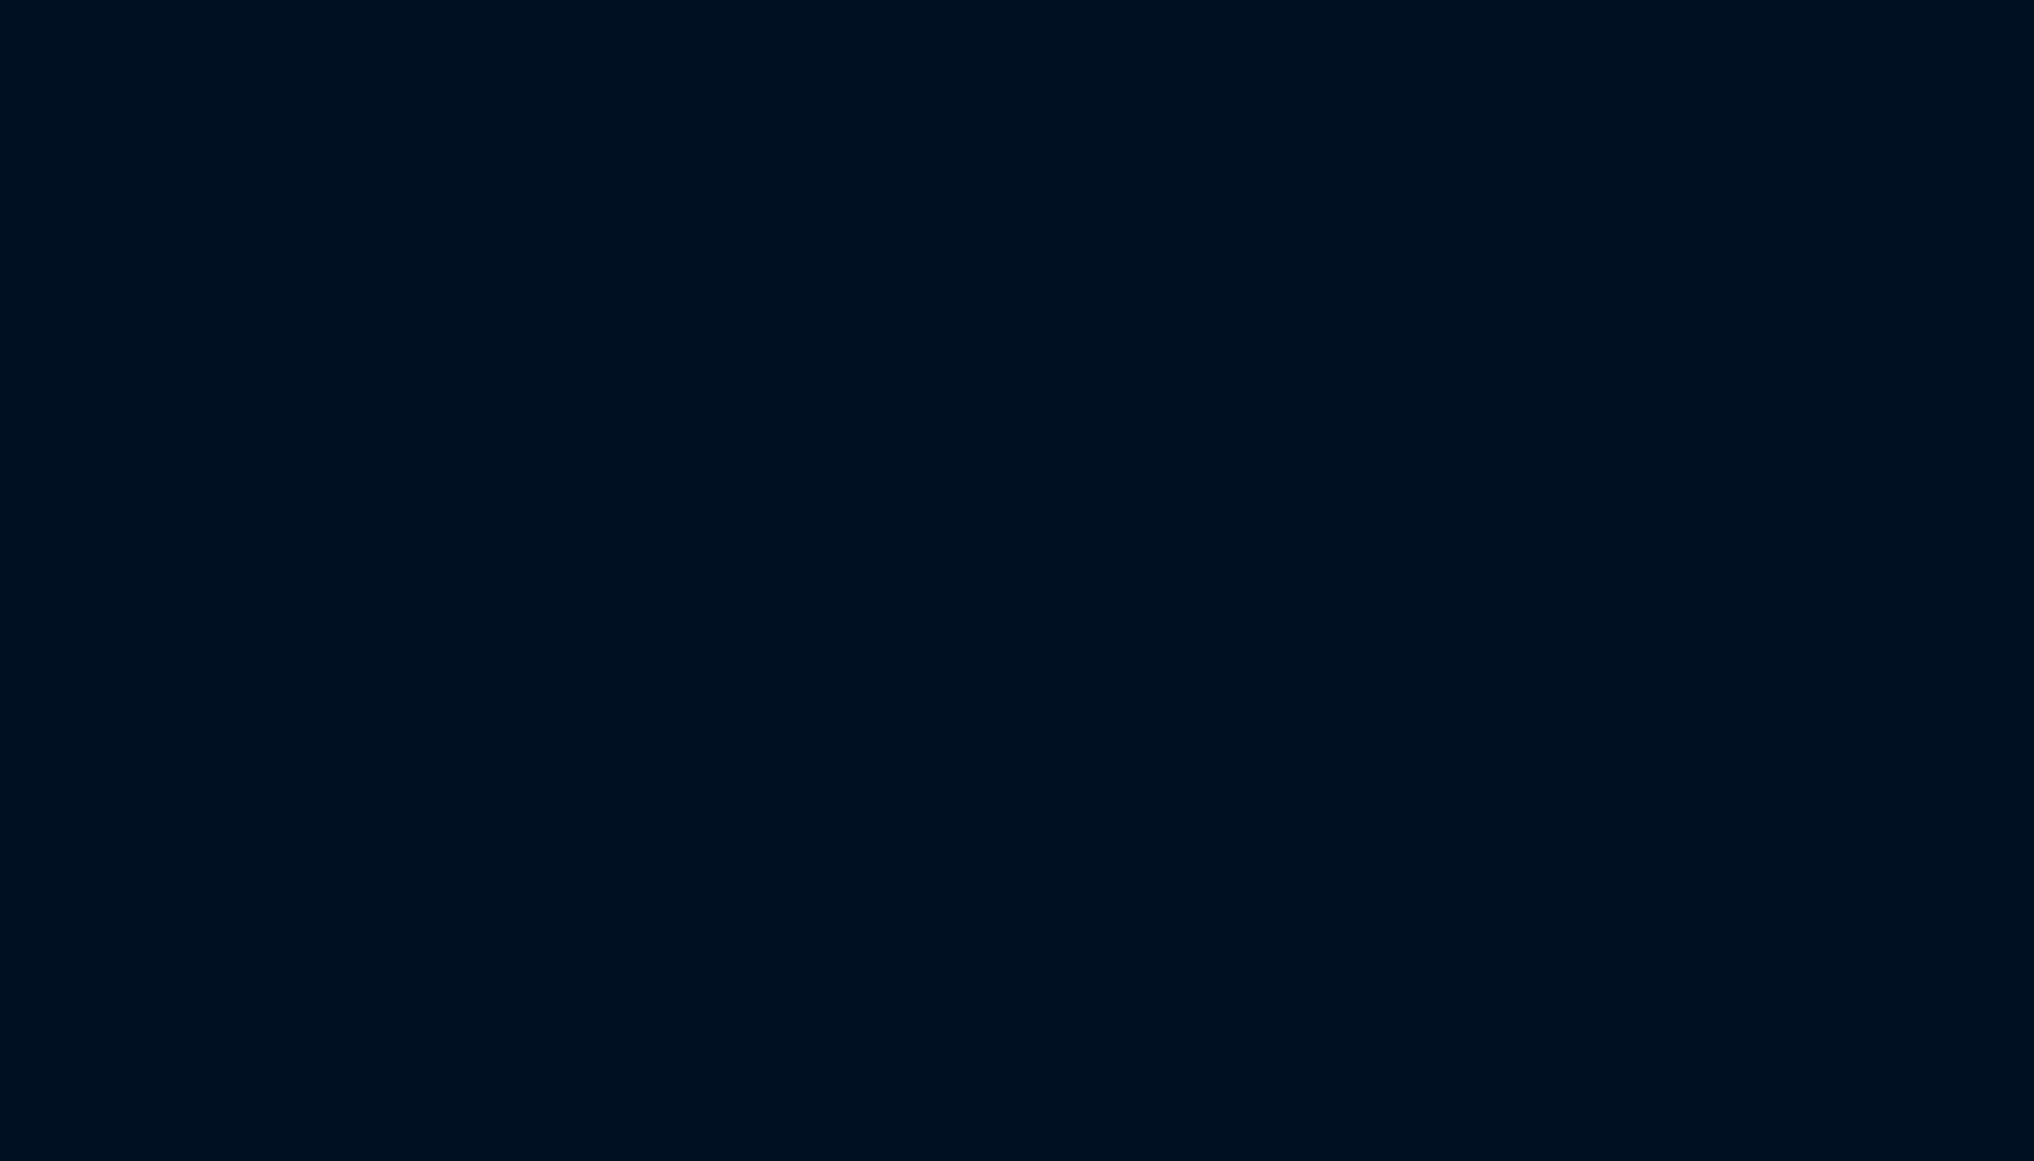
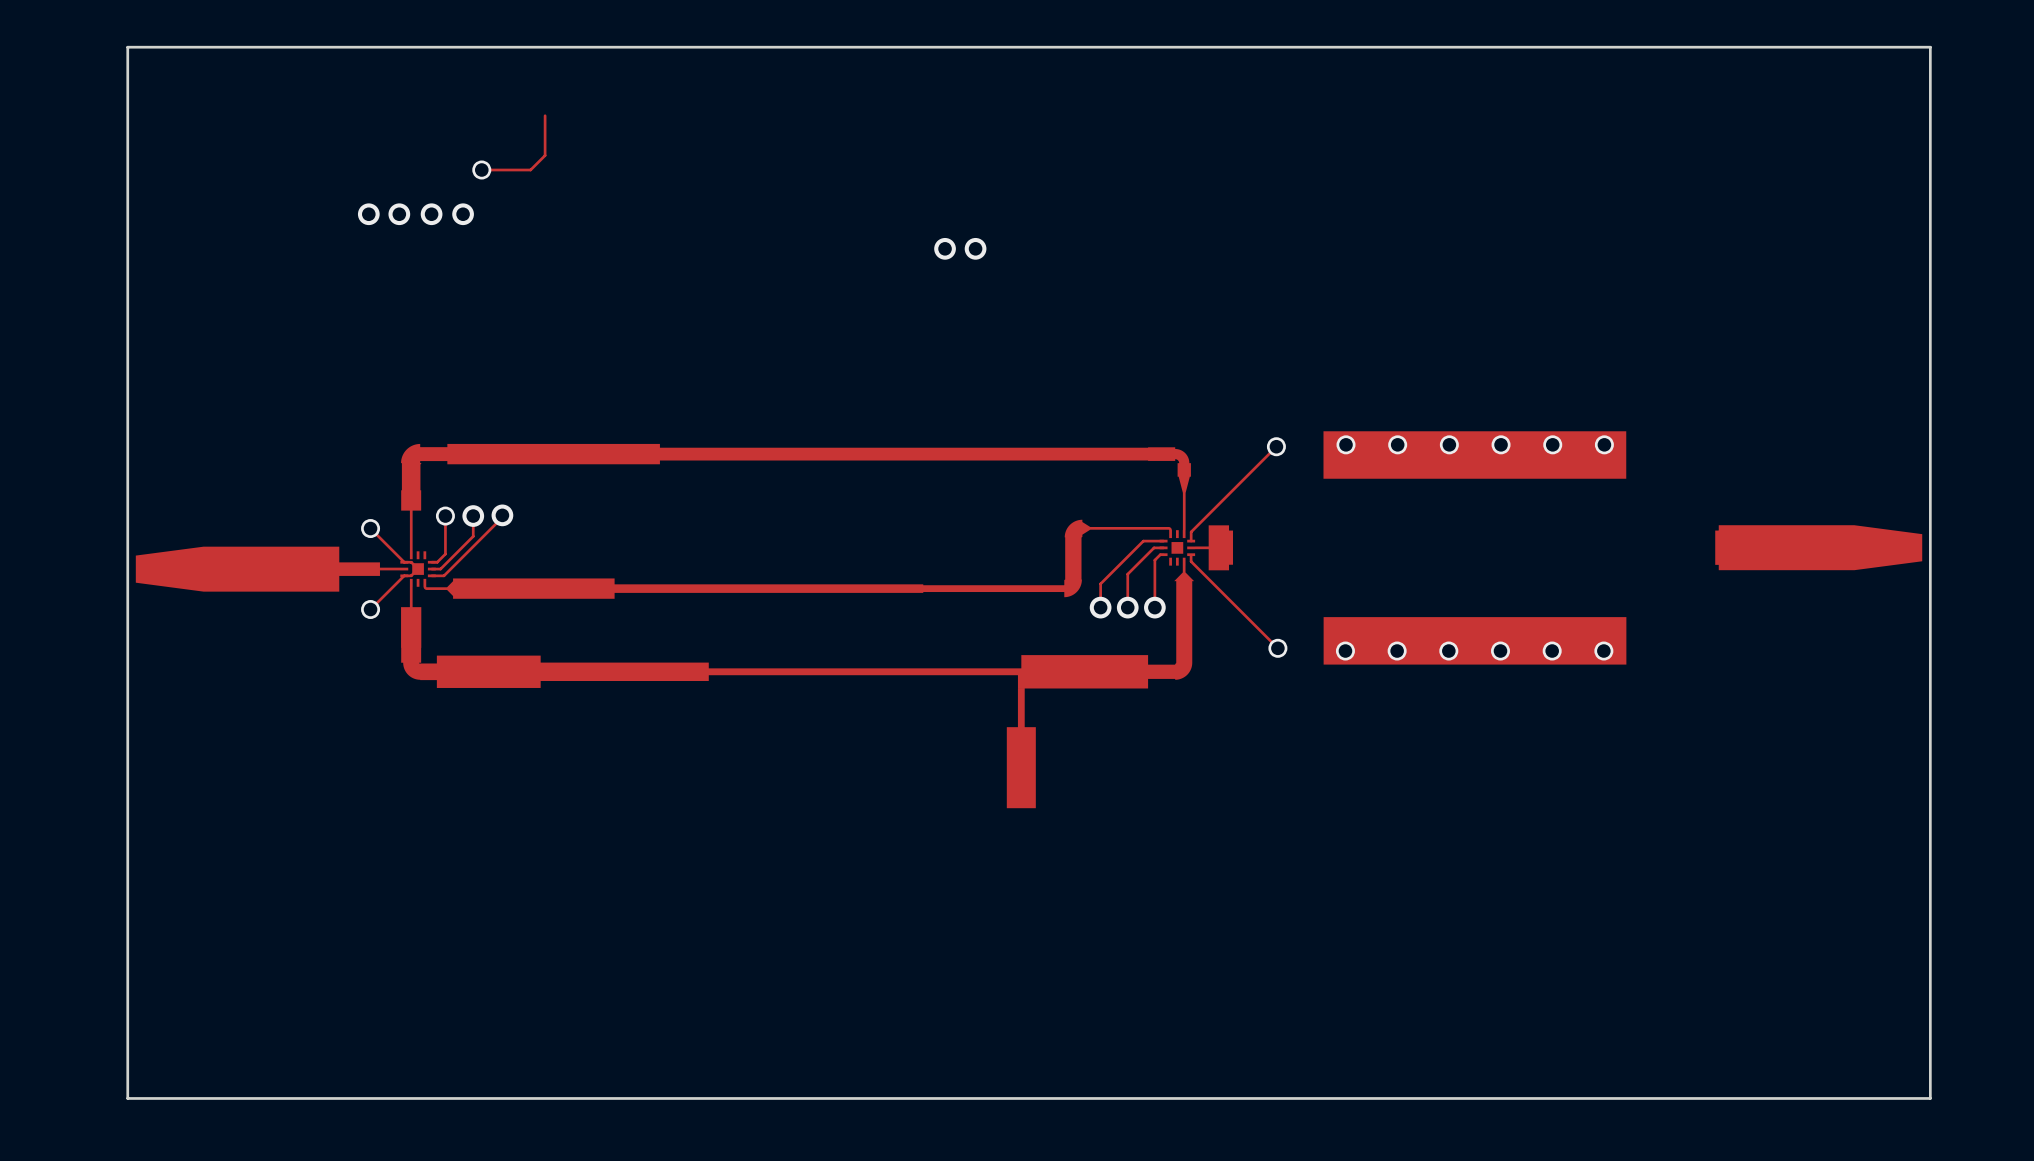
board edge: none -> (127, 47) (1930, 47) (1930, 1098) (127, 1098) (127, 47)
track: none -> (545, 115) (545, 155) (530, 170) (481, 170)
via: none -> (481, 170)
via: none -> (368, 214)
via: none -> (399, 214)
via: none -> (431, 214)
via: none -> (463, 214)
via: none -> (945, 248)
via: none -> (975, 248)
drawing: none -> [1323, 431, 1627, 479]
drawing: none -> [135, 443, 1233, 809]
via: none -> (1346, 444)
via: none -> (1397, 444)
via: none -> (1449, 444)
via: none -> (1501, 444)
via: none -> (1552, 444)
via: none -> (1604, 444)
track: none -> (1276, 446) (1191, 531) (1191, 541)
via: none -> (1276, 446)
track: none -> (502, 515) (443, 575) (431, 575)
via: none -> (502, 515)
track: none -> (445, 516) (445, 554) (437, 562) (431, 562)
via: none -> (445, 516)
track: none -> (473, 516) (473, 536) (440, 569) (431, 569)
via: none -> (473, 516)
drawing: none -> [1715, 525, 1923, 571]
track: none -> (370, 528) (404, 562)
via: none -> (370, 528)
track: none -> (1163, 541) (1143, 541) (1100, 583) (1100, 607)
track: none -> (1163, 547) (1154, 547) (1127, 574) (1127, 607)
track: none -> (1163, 554) (1160, 554) (1154, 560) (1154, 607)
track: none -> (1191, 555) (1191, 561) (1277, 648)
track: none -> (404, 562) (411, 562) (418, 569) (411, 575) (404, 575)
track: none -> (404, 575) (370, 609)
via: none -> (1100, 607)
via: none -> (1127, 607)
via: none -> (1154, 607)
via: none -> (370, 609)
drawing: none -> [1323, 617, 1627, 665]
via: none -> (1277, 648)
via: none -> (1345, 651)
via: none -> (1397, 651)
via: none -> (1448, 651)
via: none -> (1500, 651)
via: none -> (1552, 651)
via: none -> (1603, 651)

